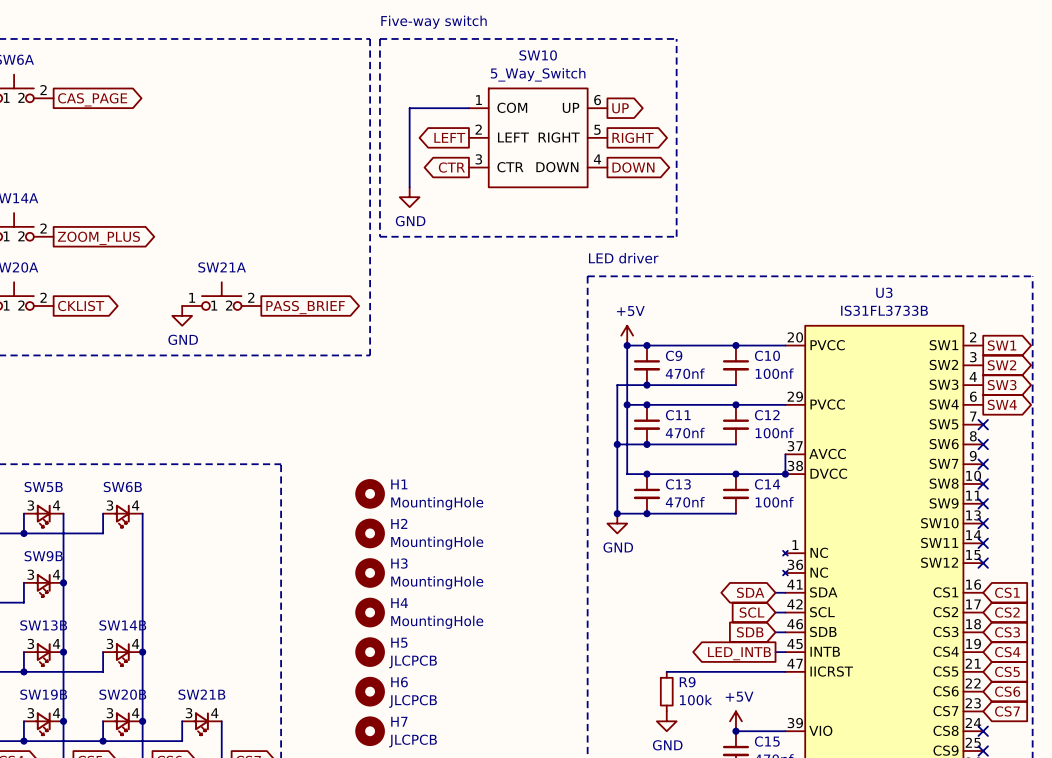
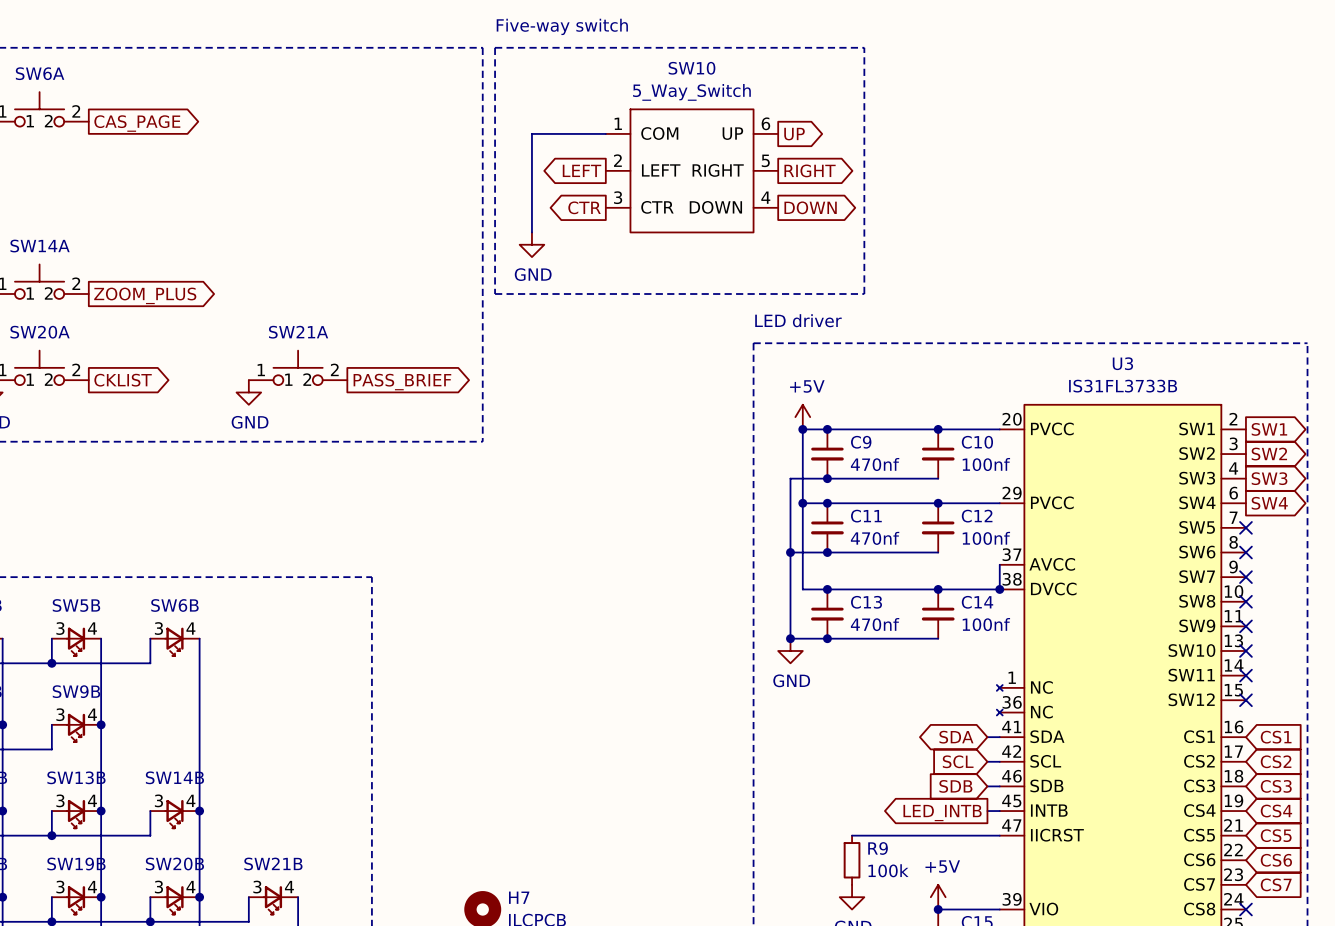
H1: MountingHole (370, 493) -> none
H2: MountingHole (370, 533) -> none
H3: MountingHole (370, 572) -> none
H4: MountingHole (370, 612) -> none
H5: JLCPCB (370, 652) -> none
H6: JLCPCB (370, 691) -> none

